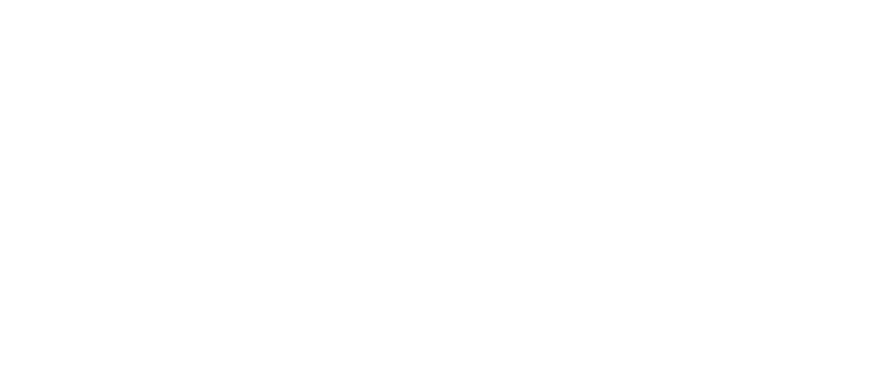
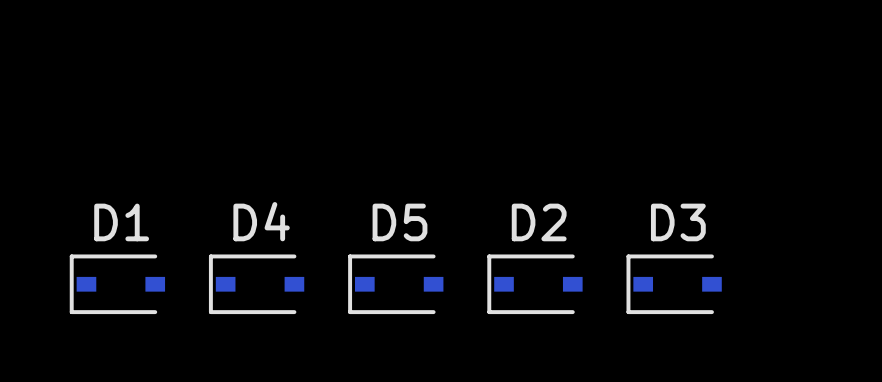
D1: none -> (117, 284)
D4: none -> (256, 284)
D5: none -> (395, 284)
D2: none -> (534, 284)
D3: none -> (674, 284)

